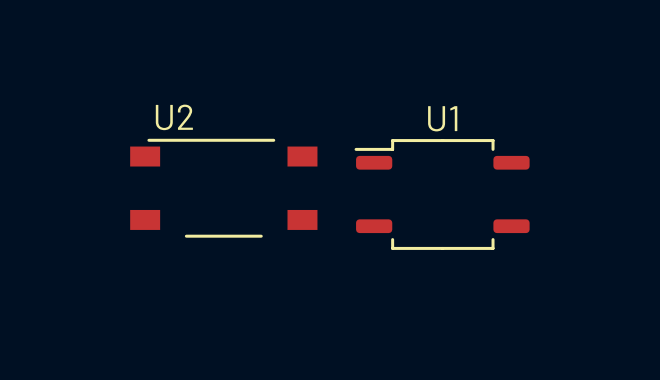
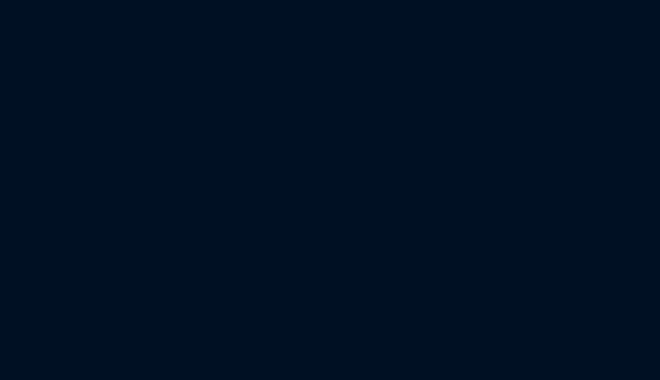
U2: (223, 188) -> none
U1: (442, 194) -> none

